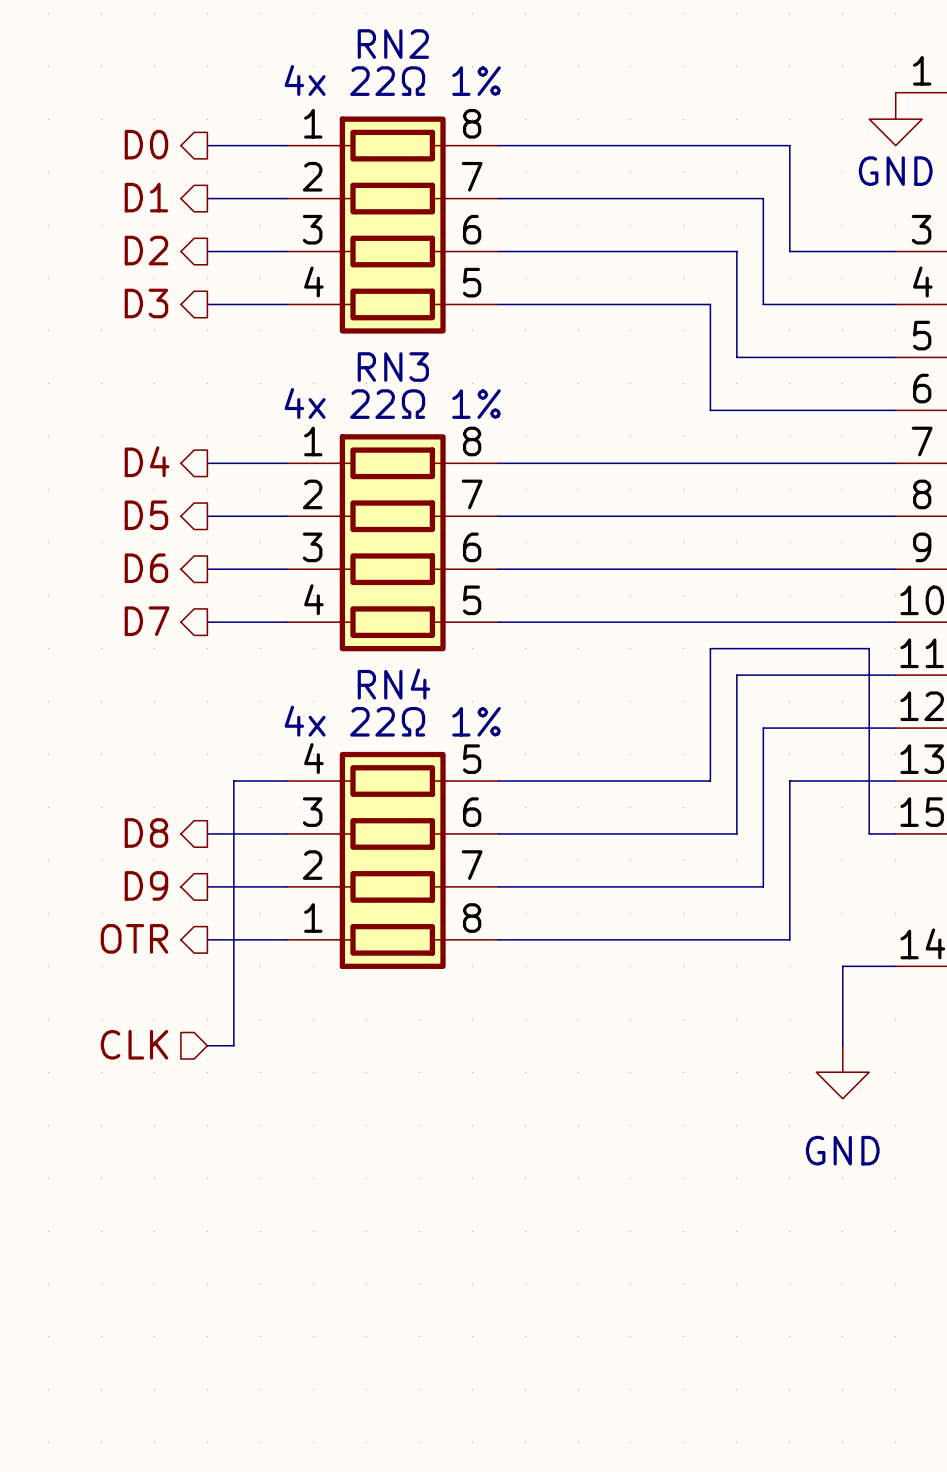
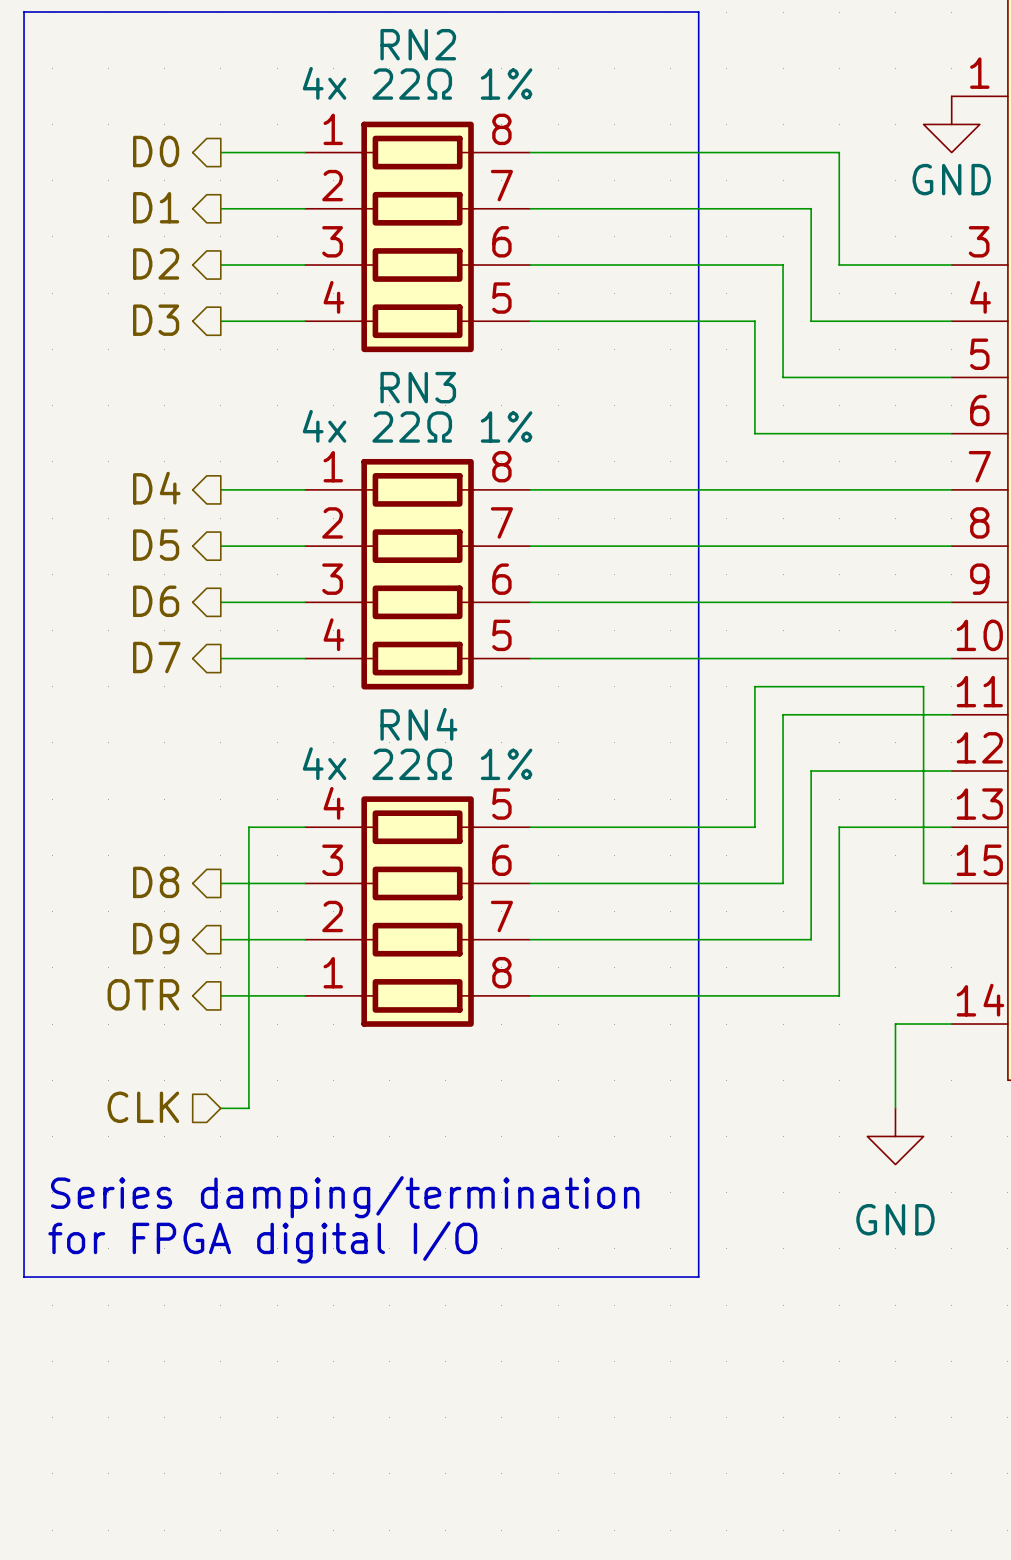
line: none -> (24, 12) (698, 12) (698, 1277) (24, 1277) (24, 12)
text: none -> Series damping/termination (345, 1197)
text: none -> for FPGA digital I/O (262, 1242)

